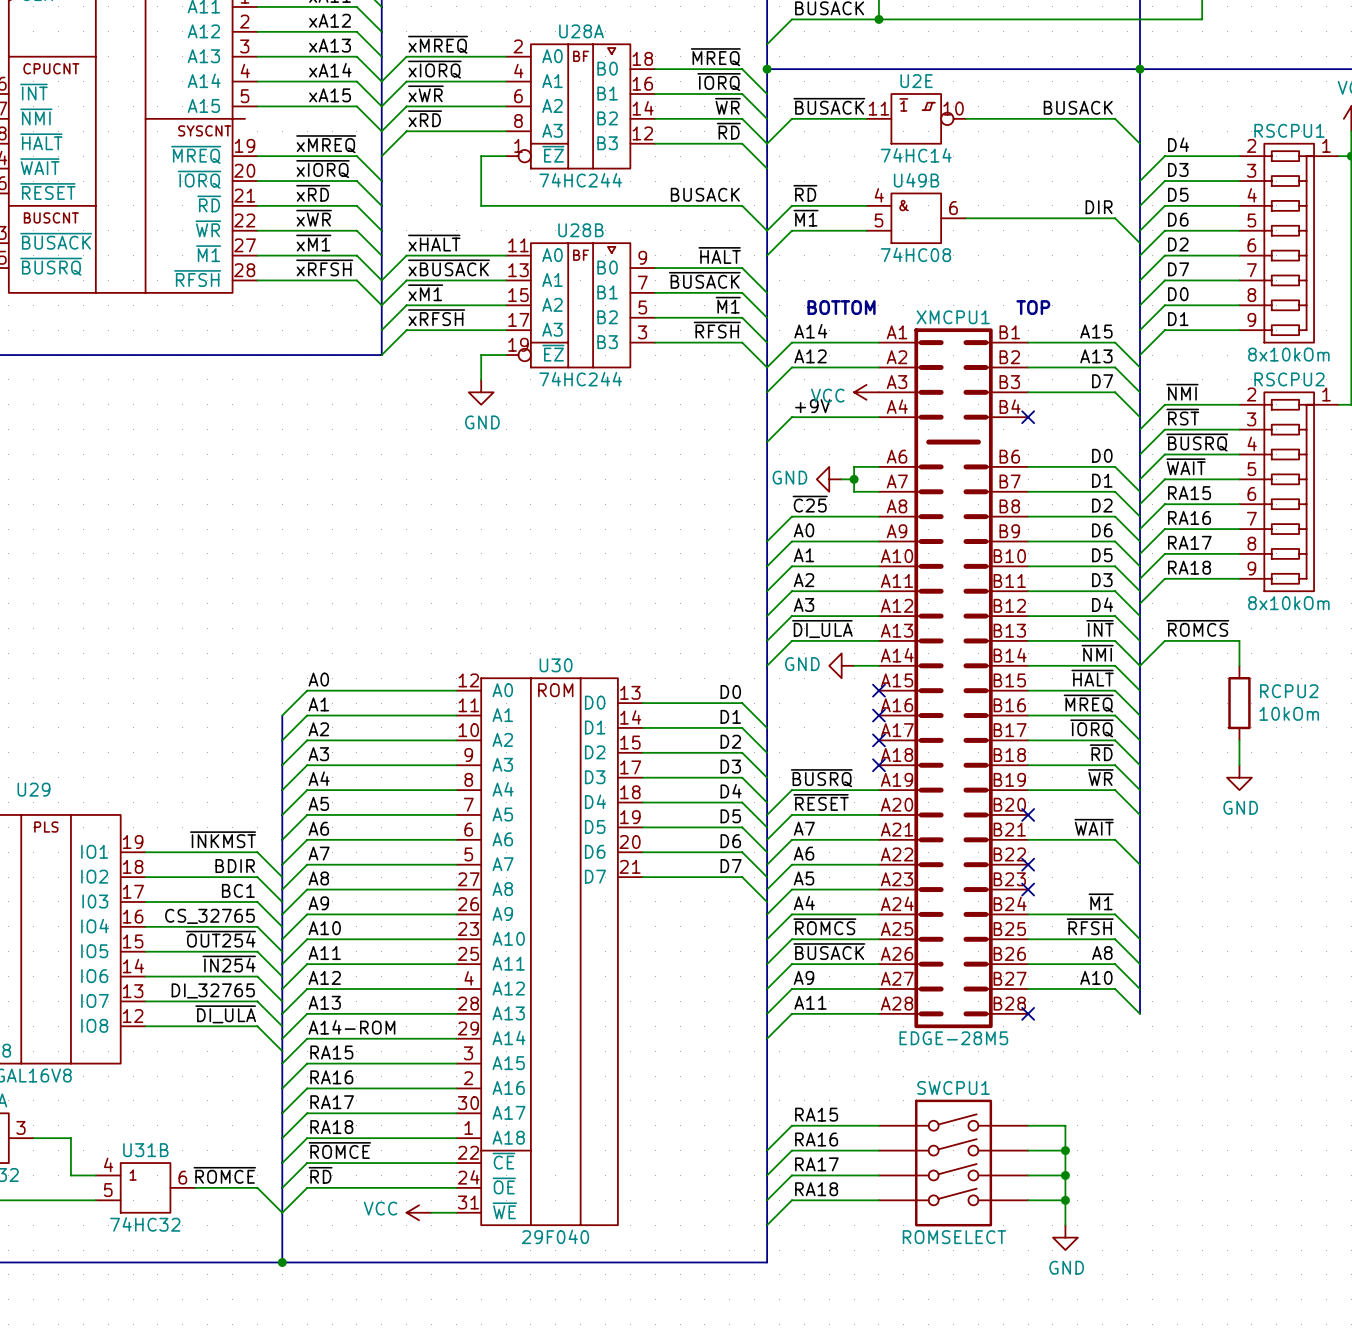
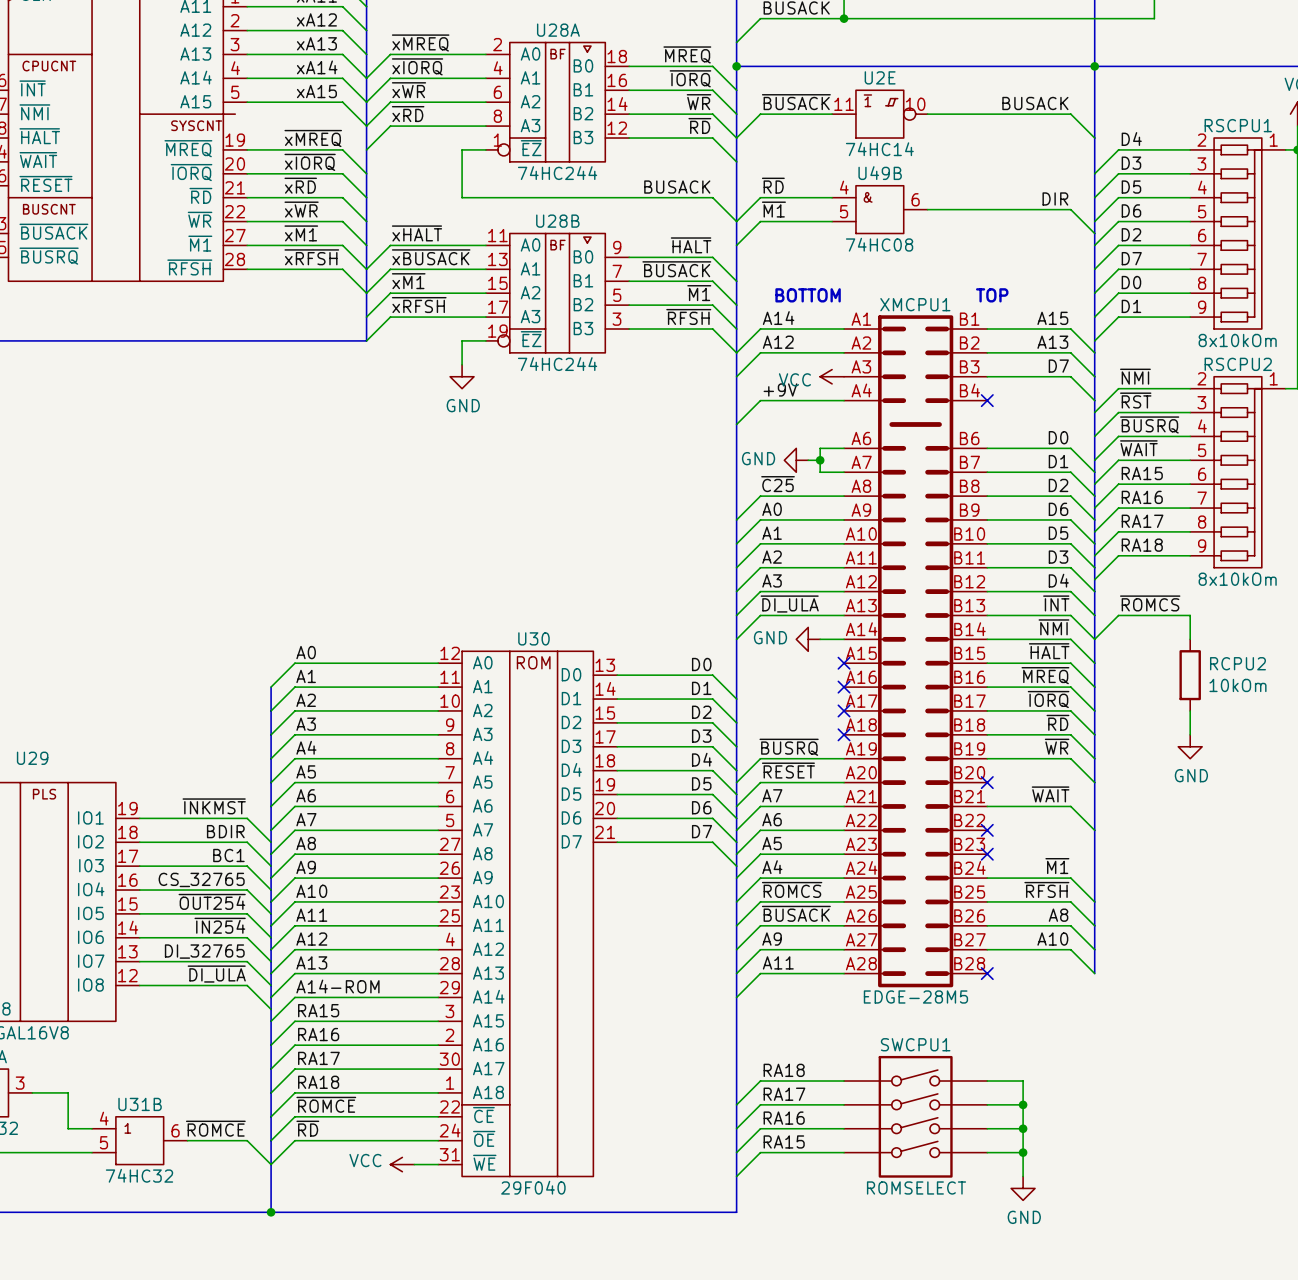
label: RA15 (816, 1114) -> RA18 (784, 1070)
label: RA16 (816, 1139) -> RA17 (784, 1094)
label: RA17 (816, 1164) -> RA16 (784, 1118)
label: RA18 (816, 1189) -> RA15 (784, 1141)

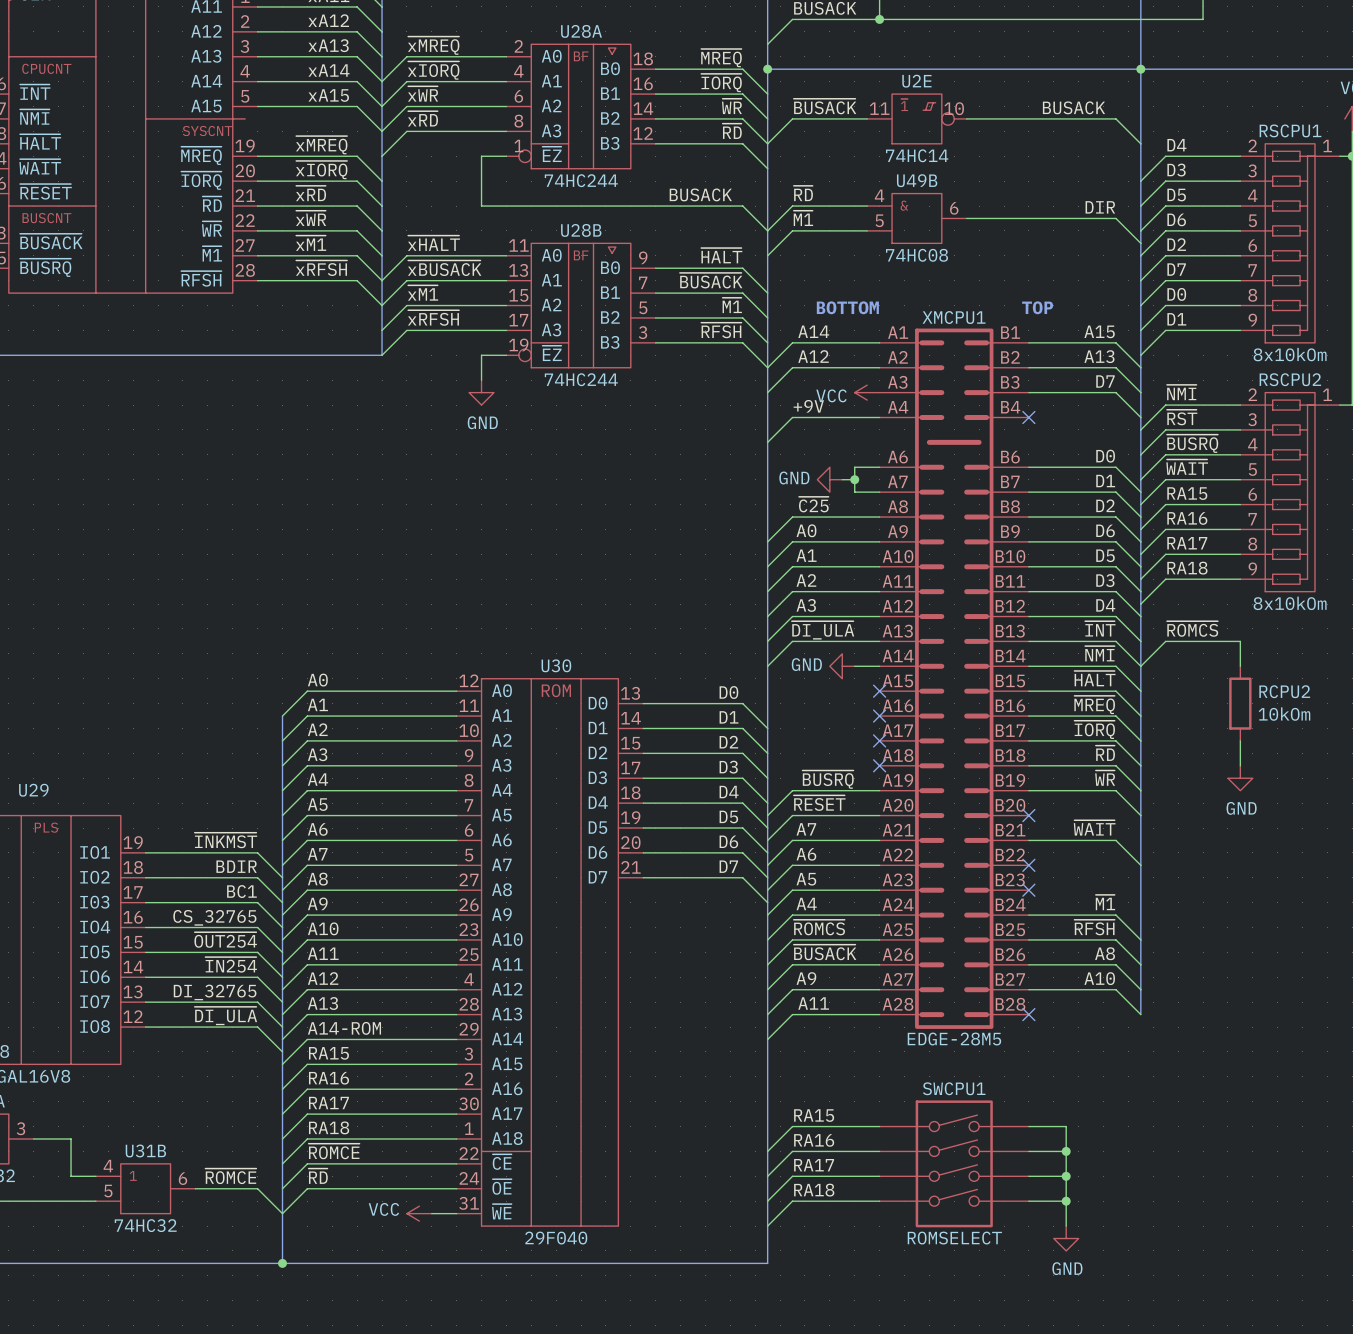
label: RA18 (784, 1070) -> RA15 (814, 1115)
label: RA17 (784, 1094) -> RA16 (814, 1140)
label: RA16 (784, 1118) -> RA17 (814, 1165)
label: RA15 (784, 1141) -> RA18 (814, 1190)

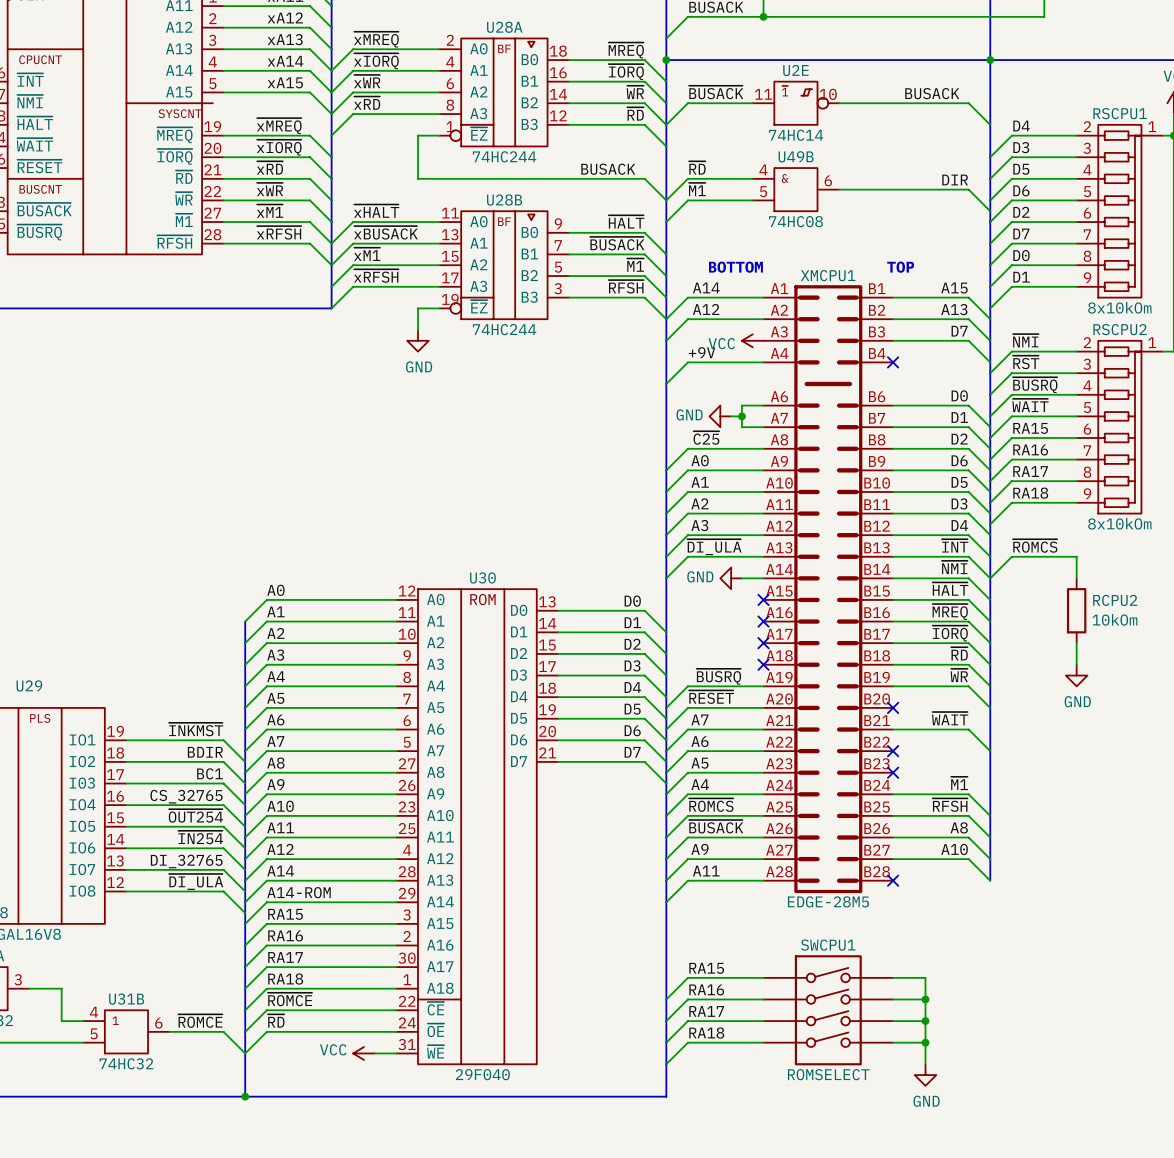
label: A13 (322, 1003) -> A14 (280, 871)

